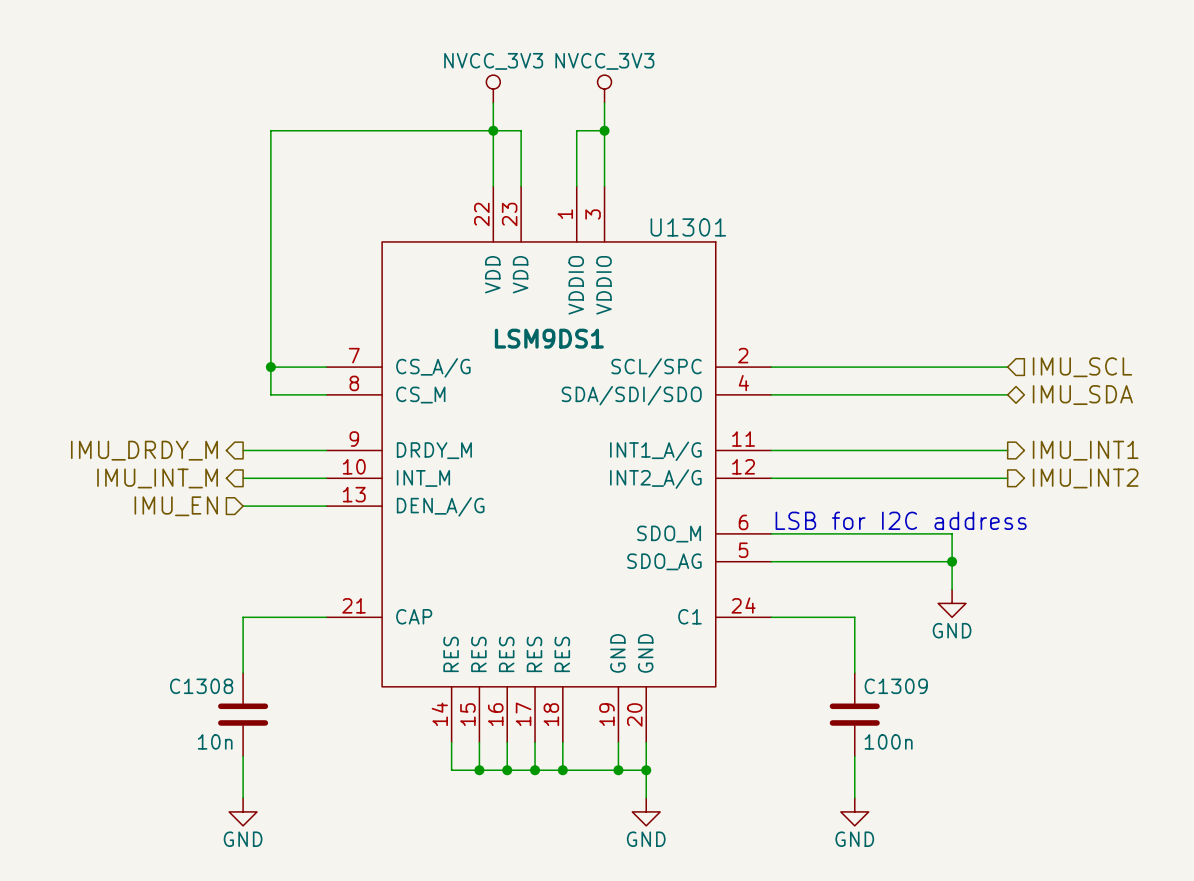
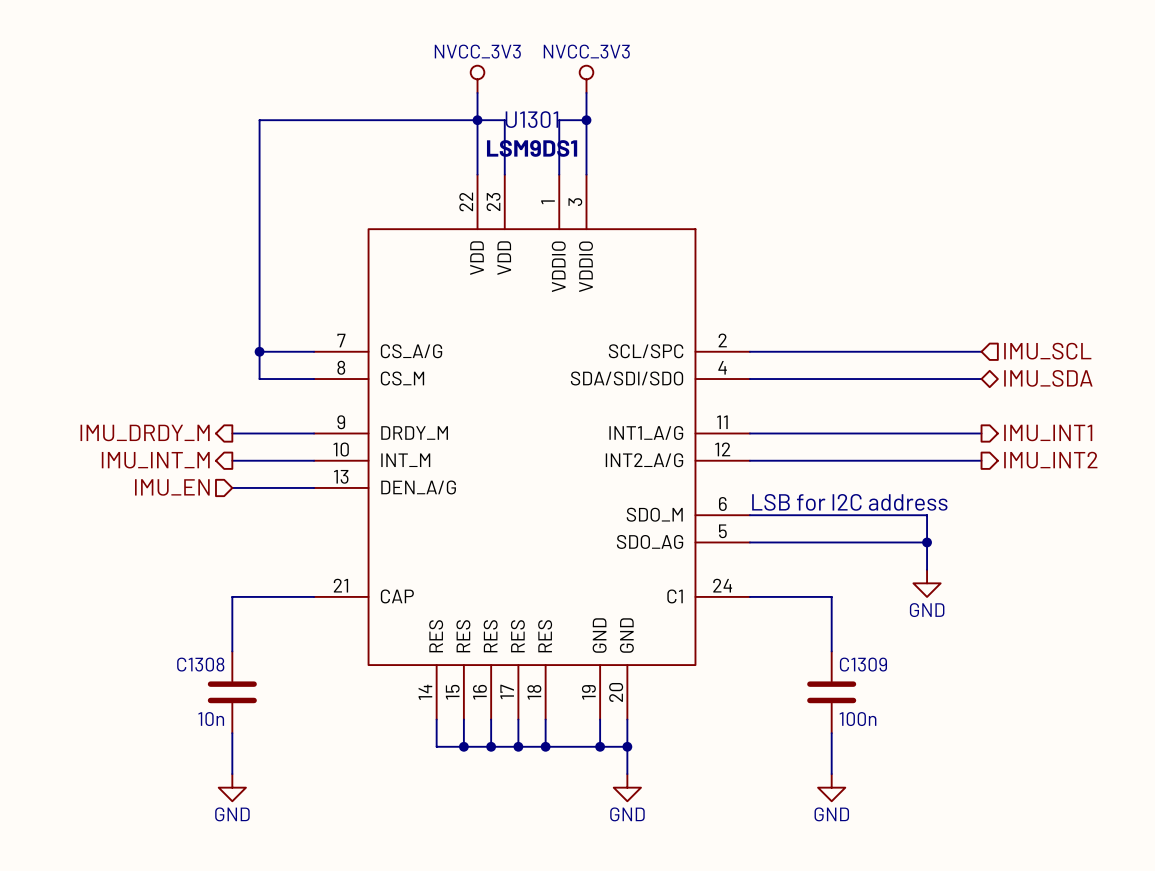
U1301 name position: U1301 (688, 227) -> U1301 (531, 119)
U1301 value position: LSM9DS1 (549, 338) -> LSM9DS1 (532, 148)

